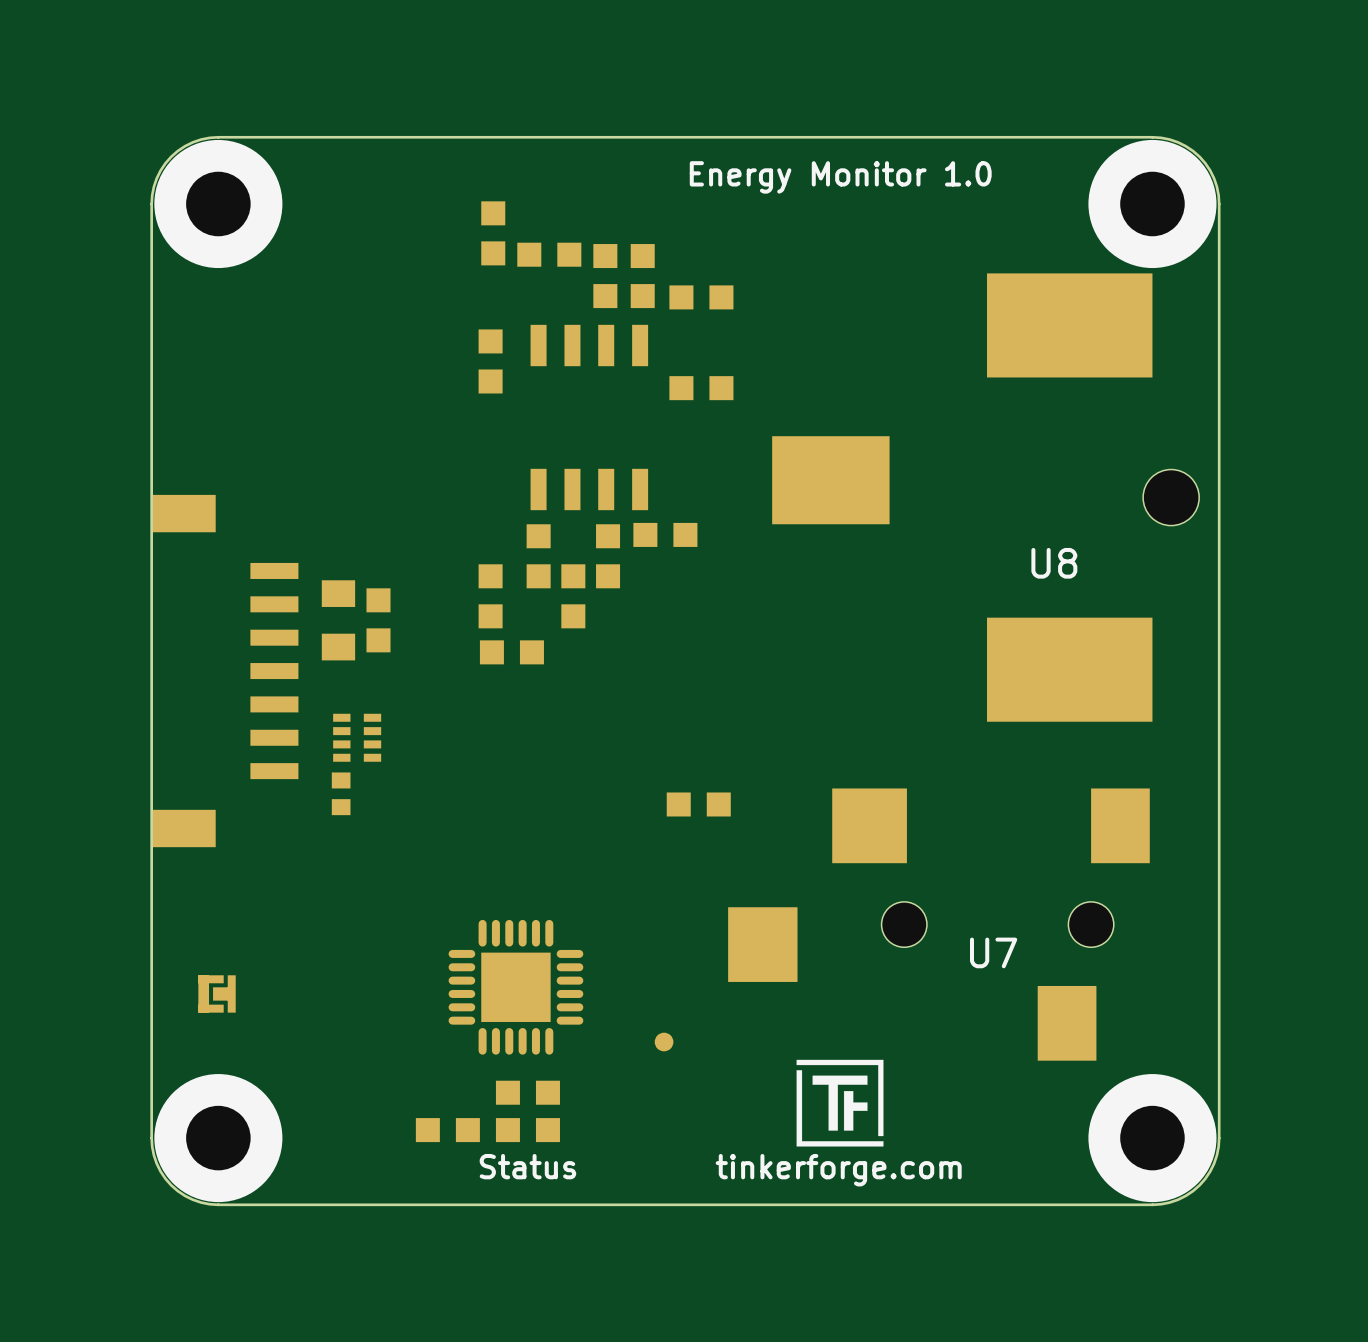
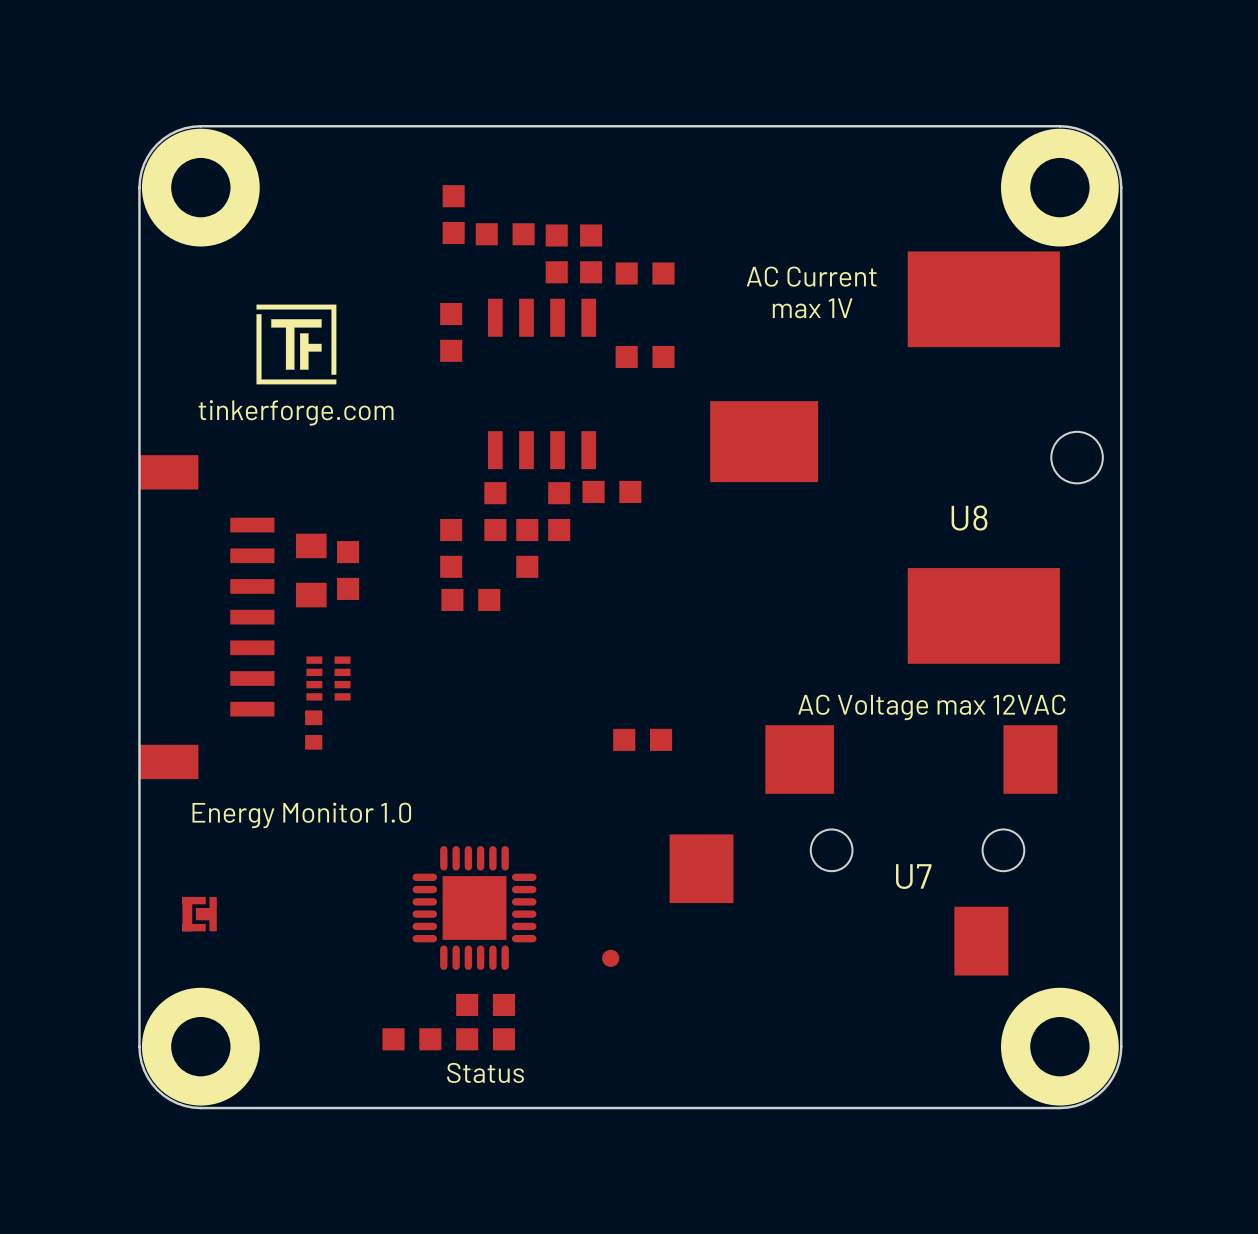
text: Energy Monitor 1.0 (840, 177) -> none
text: none -> AC Current (811, 276)
drawing: none -> [256, 304, 337, 385]
text: none -> max 1V (812, 308)
text: none -> tinkerforge.com (296, 412)
text: none -> AC Voltage max 12VAC (931, 707)
text: none -> Energy Monitor 1.0 (301, 815)
drawing: [796, 1059, 884, 1147] -> none
text: tinkerforge.com (838, 1170) -> none

